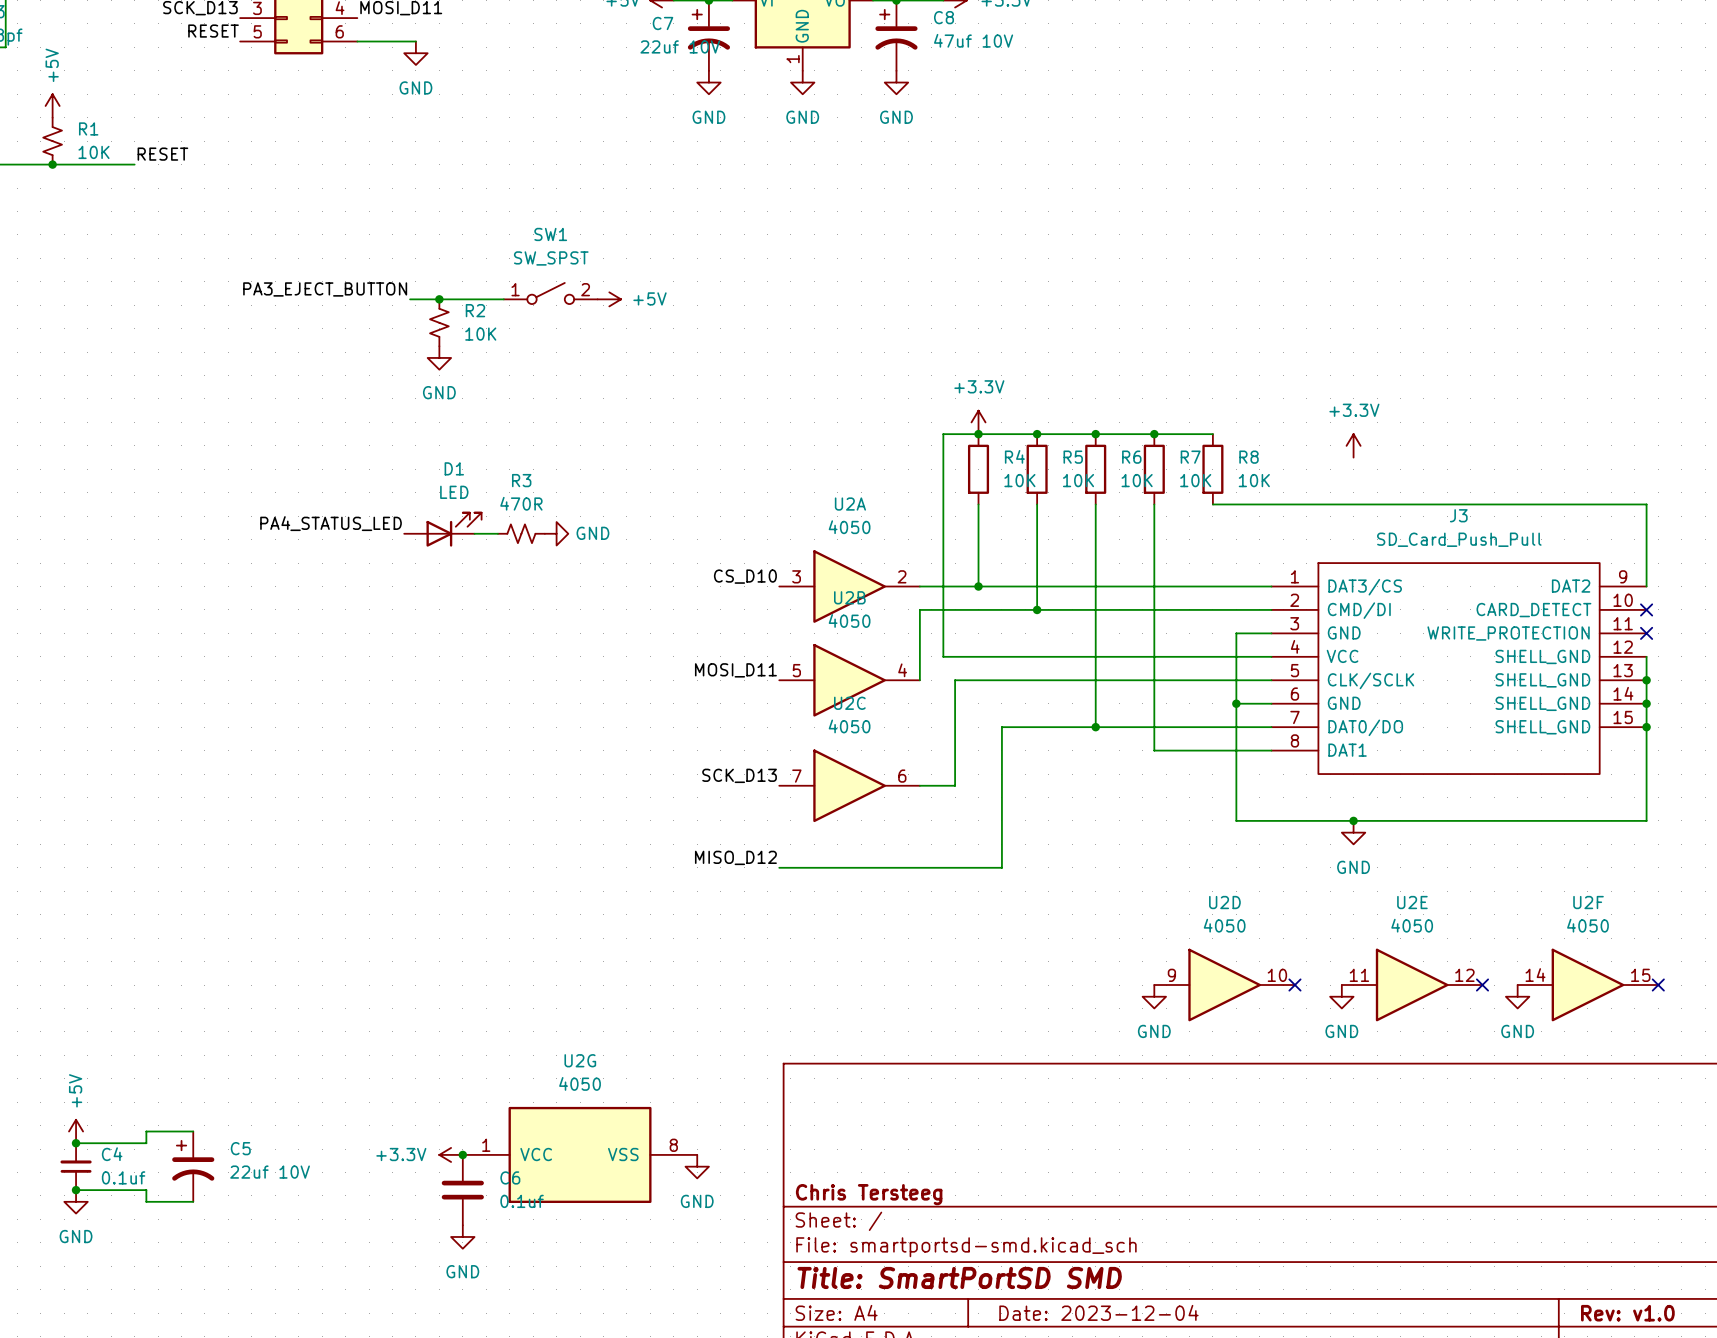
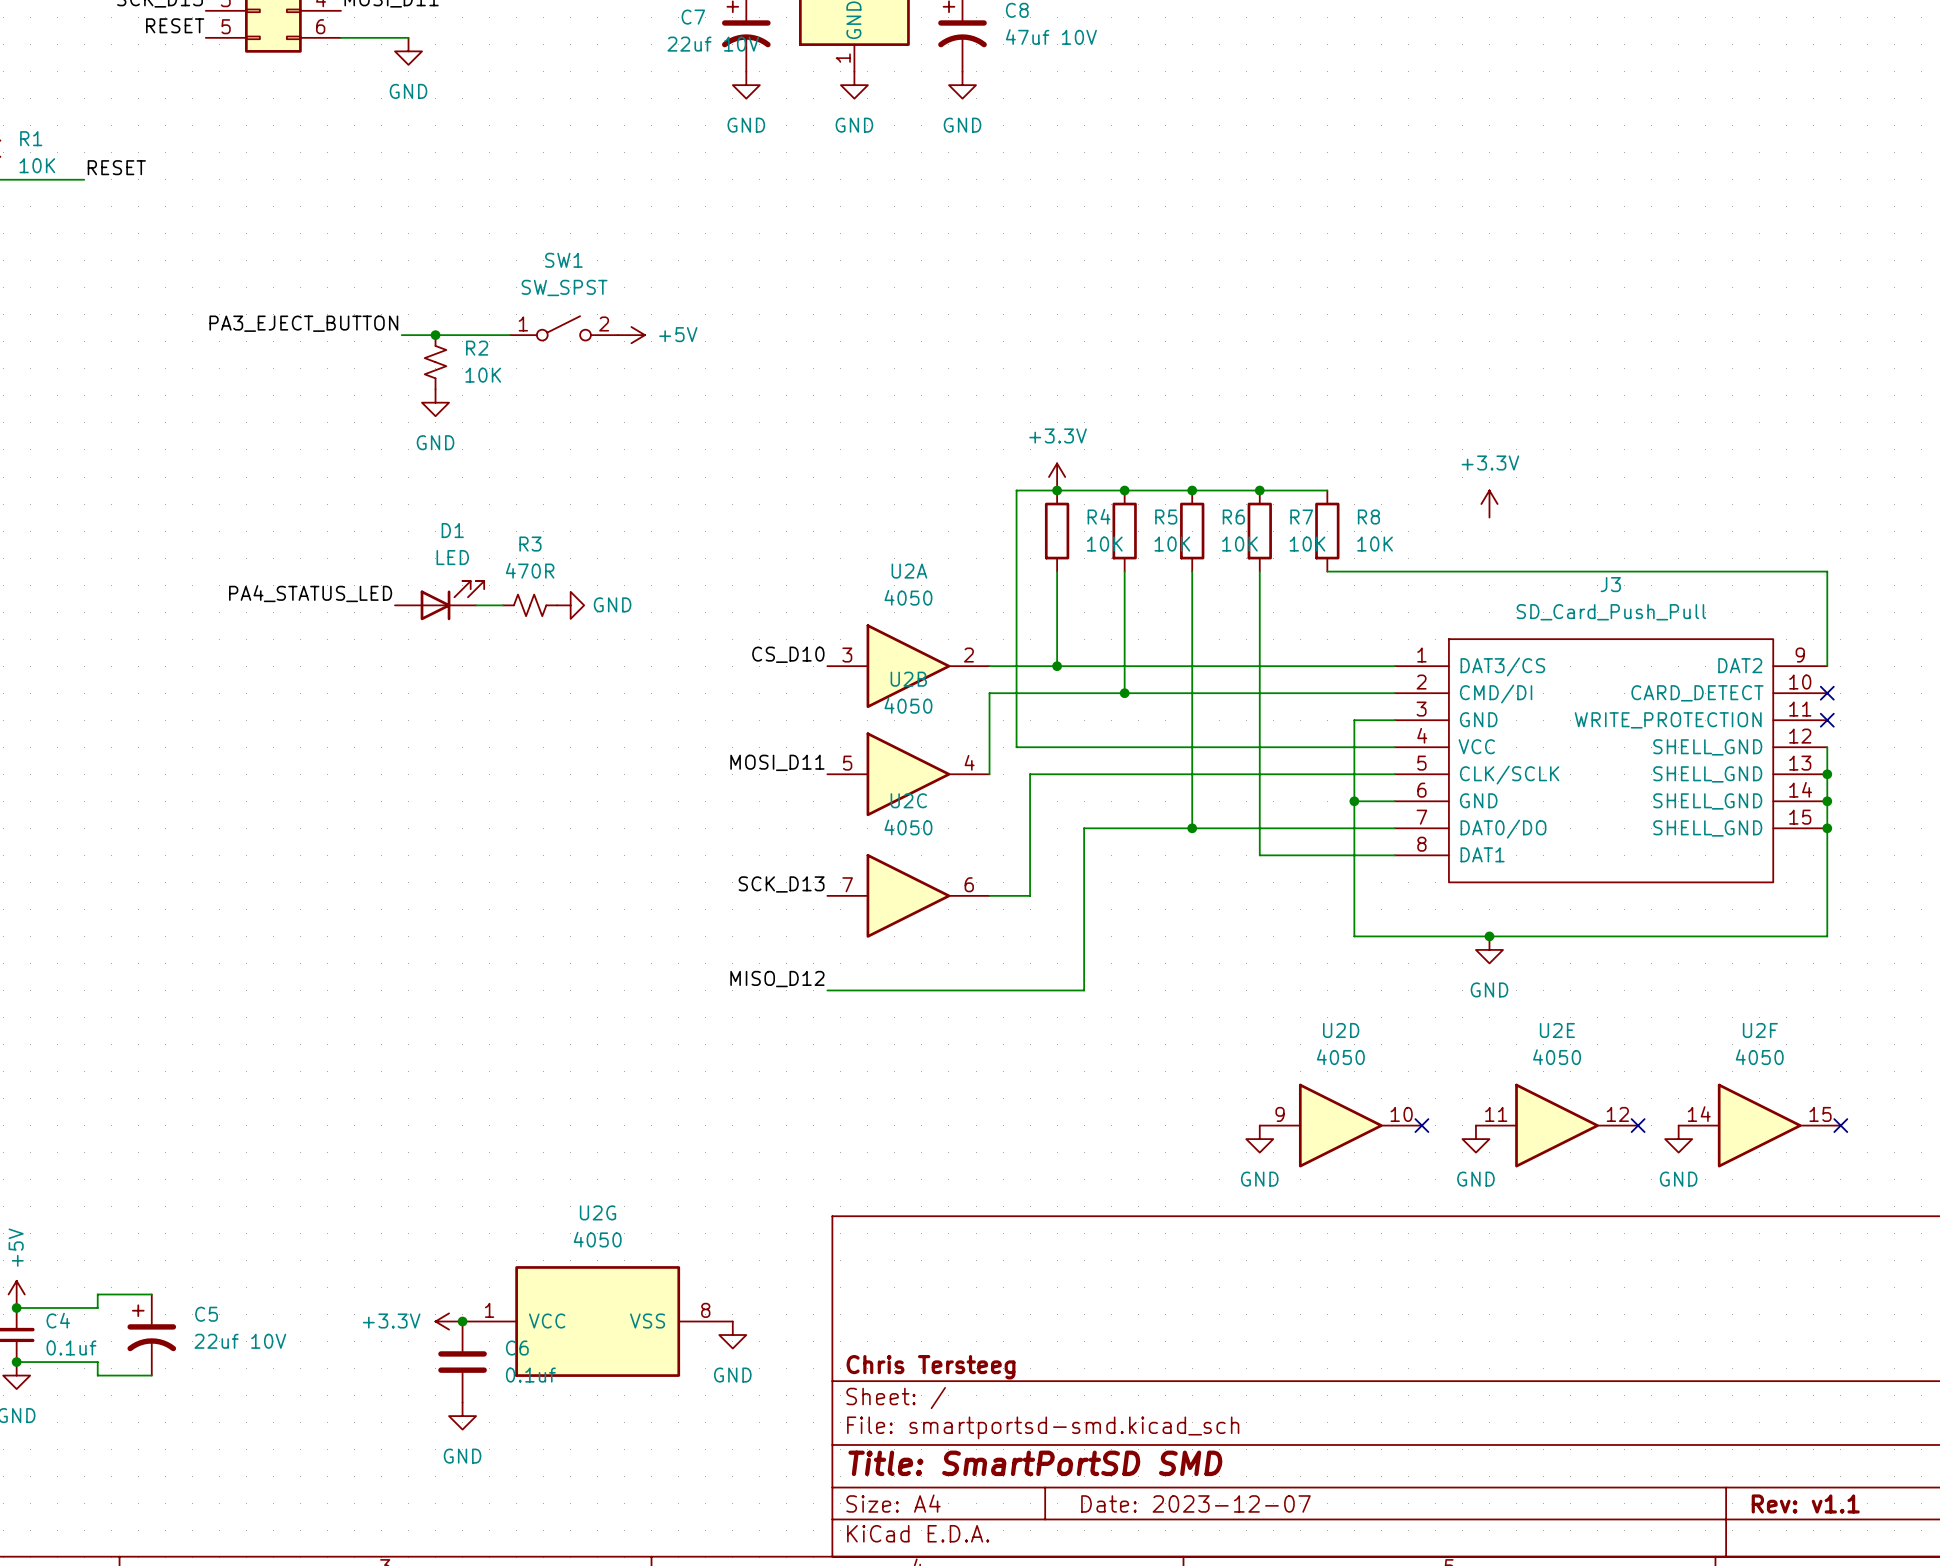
title block: Date: 2023-12-04 (1098, 1312) -> Date: 2023-12-07 (1195, 1503)
title block: Rev: v1.0 (1627, 1313) -> Rev: v1.1 (1805, 1503)

